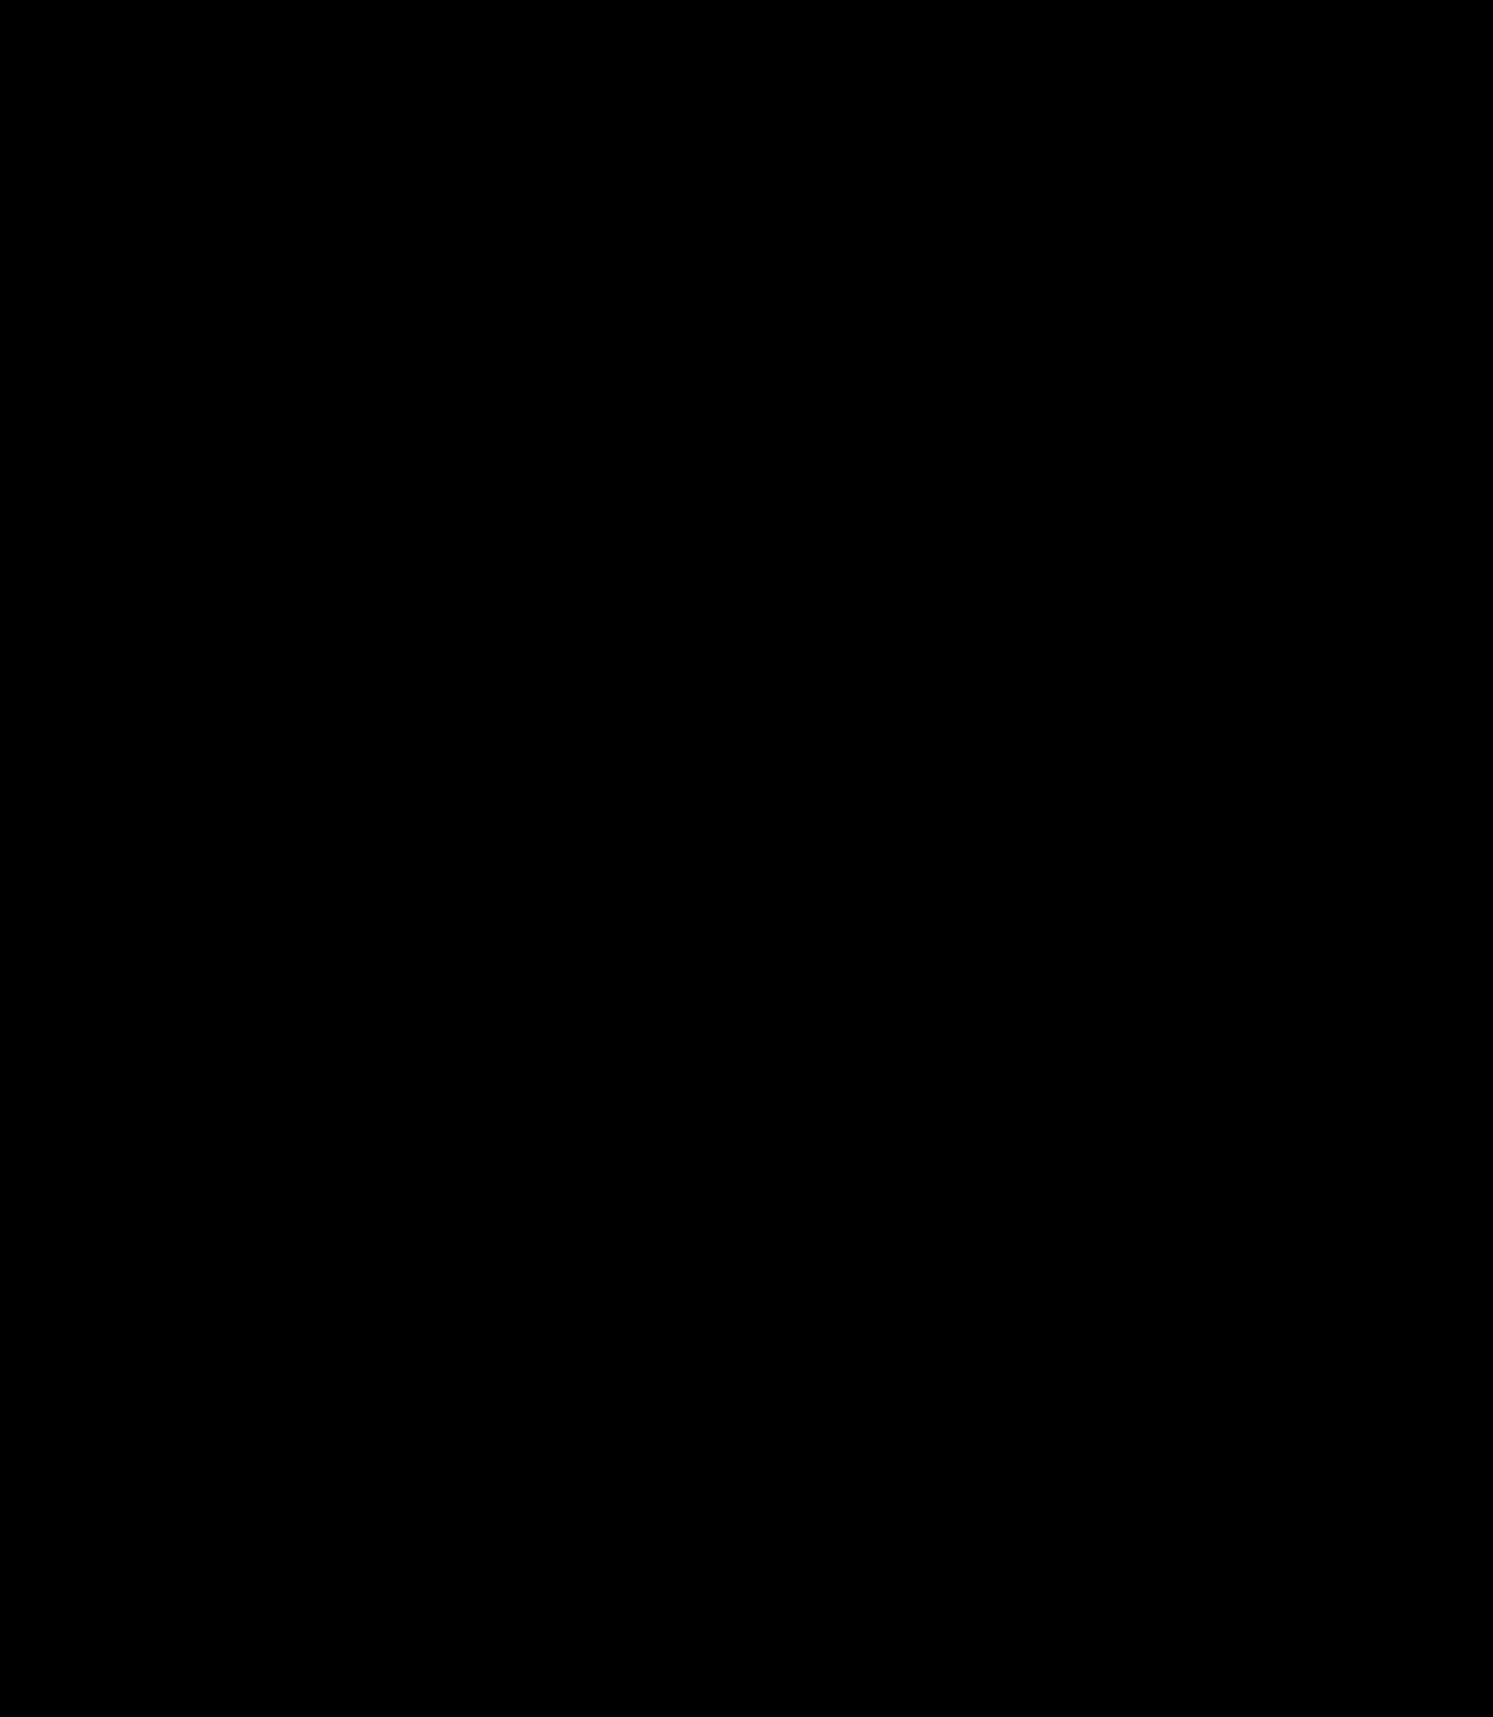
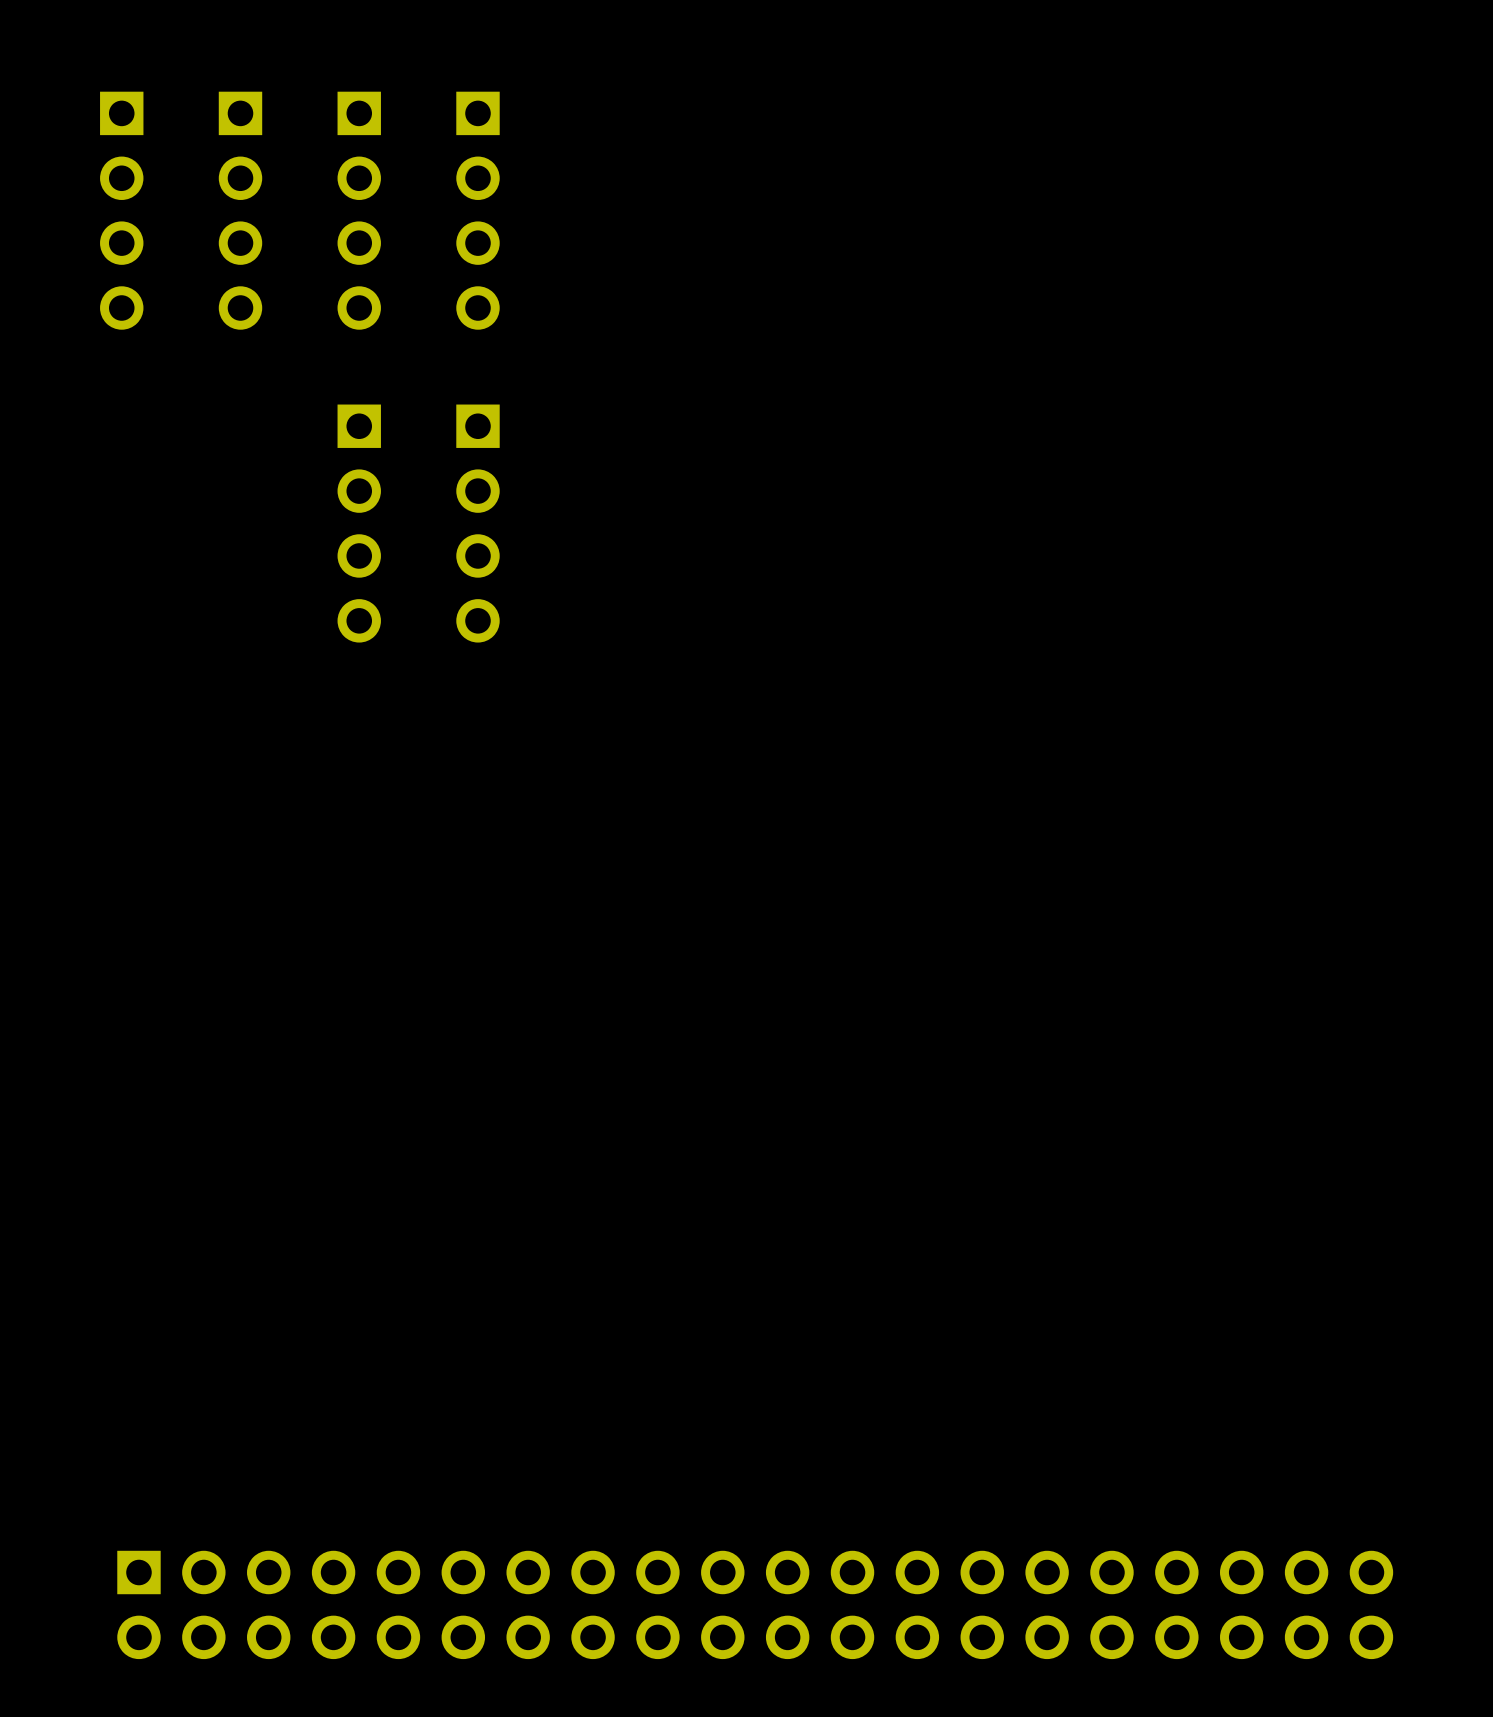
part: none -> (121, 210)
part: none -> (240, 210)
part: none -> (359, 210)
part: none -> (477, 210)
part: none -> (359, 523)
part: none -> (477, 523)
part: none -> (755, 1604)

